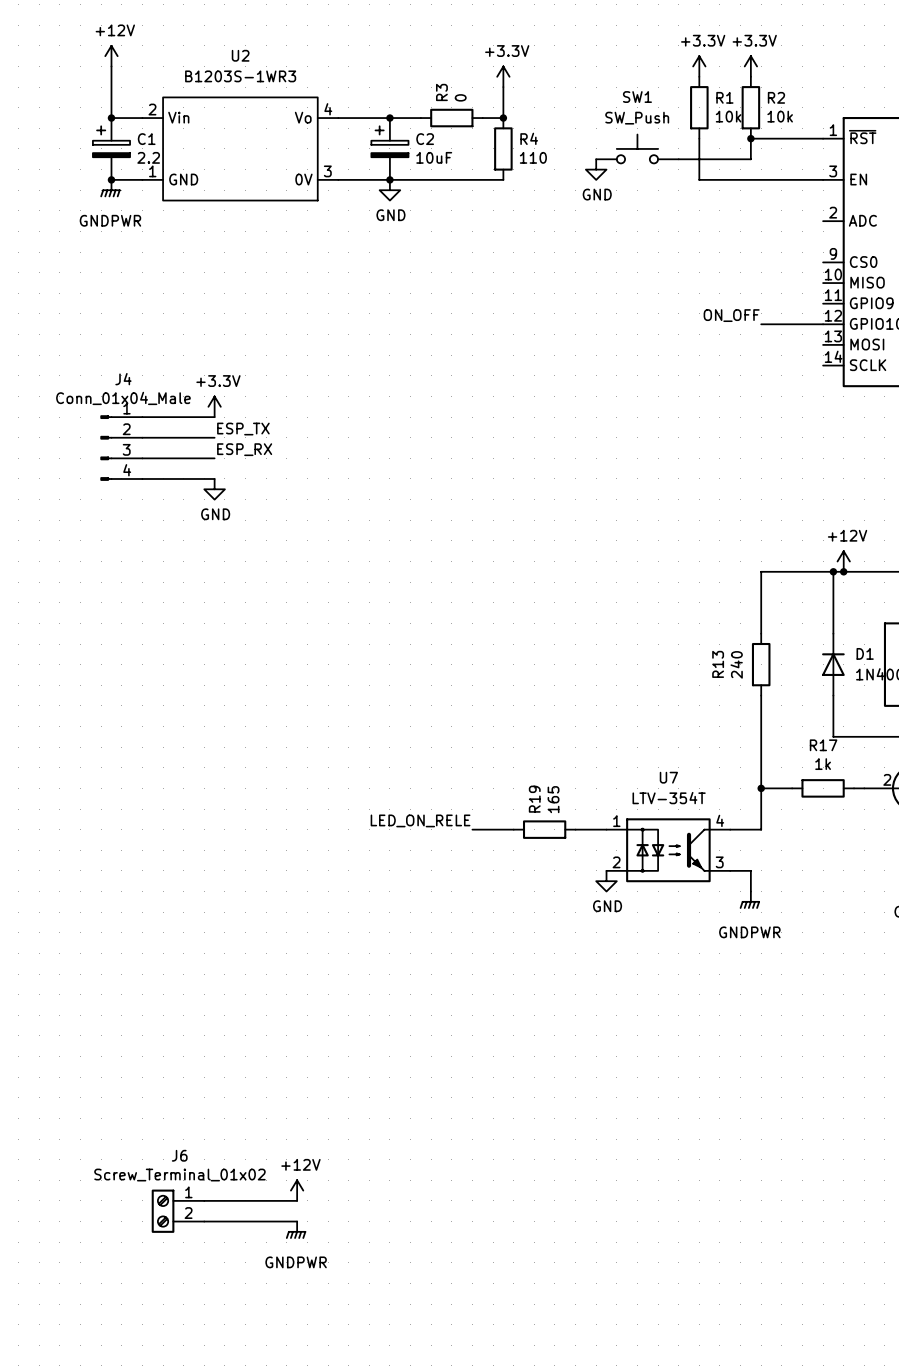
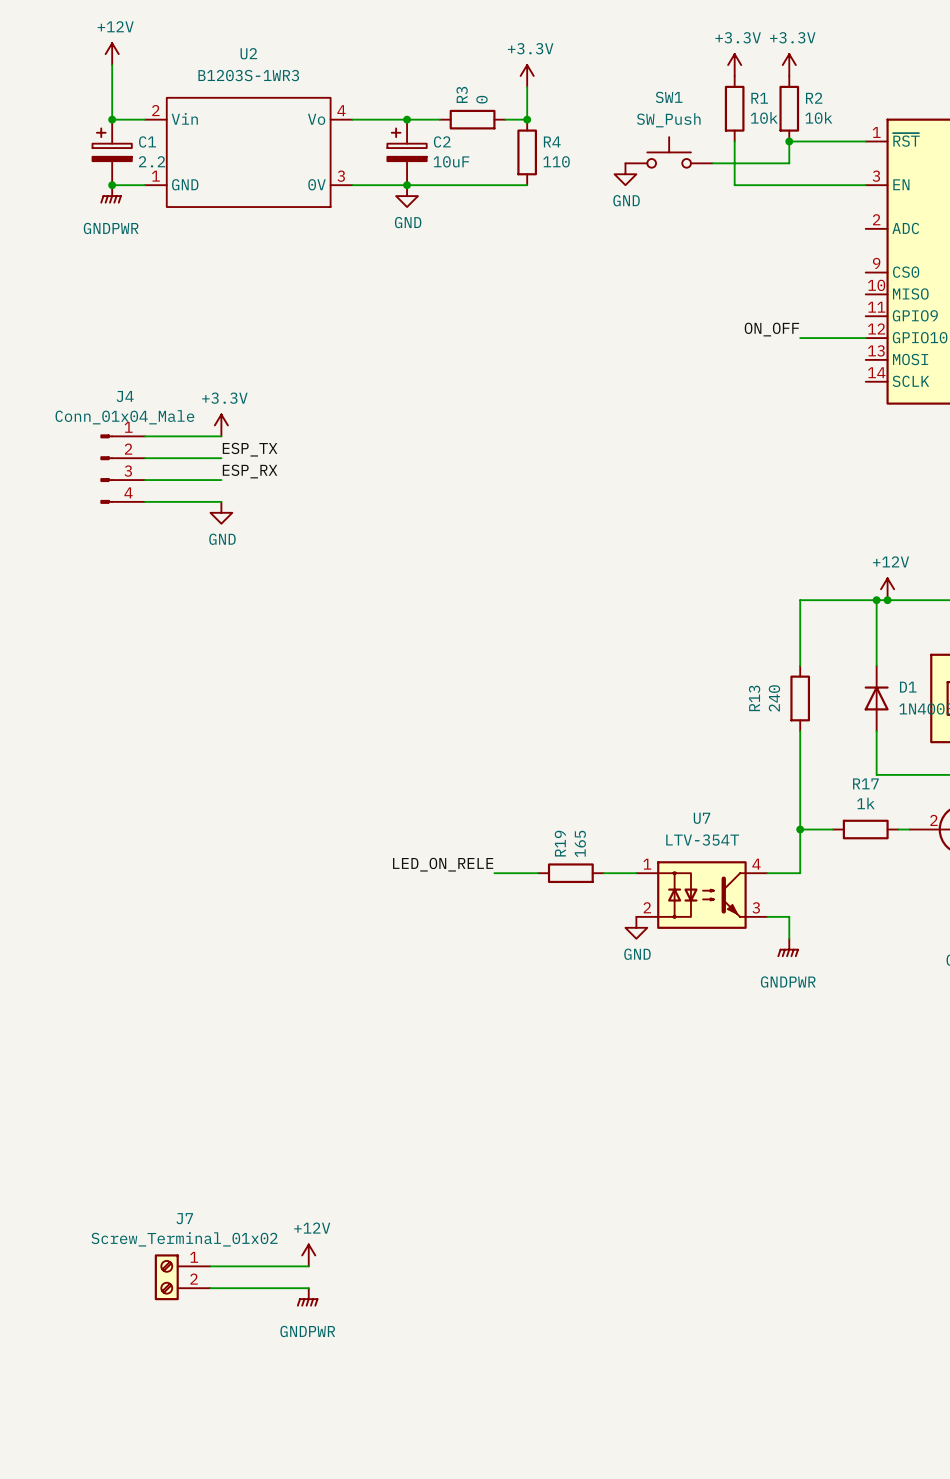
J6 name: J6 (179, 1155) -> J7 (184, 1218)

